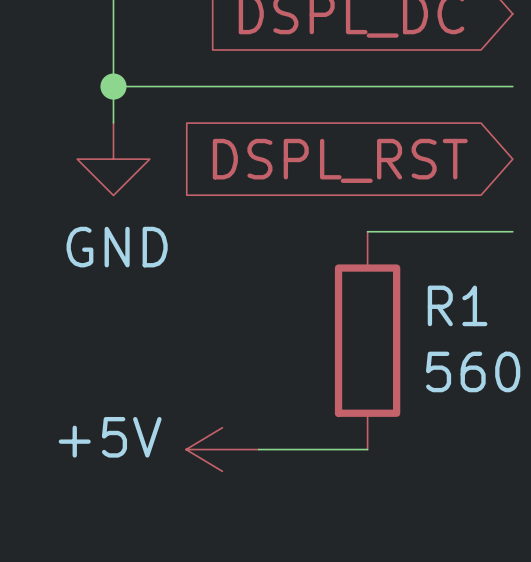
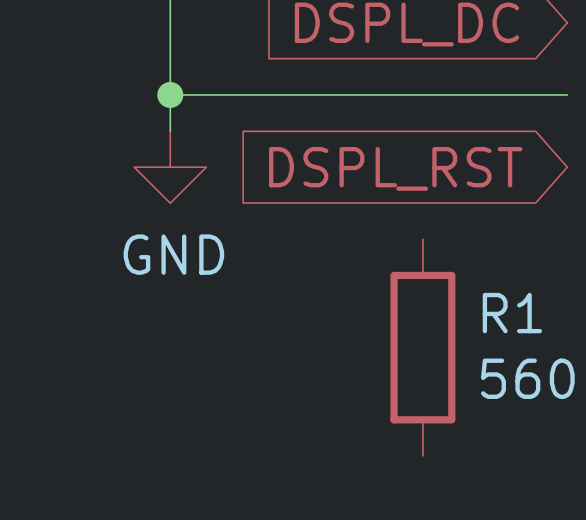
wire: (367, 231) (512, 231) -> none
power symbol: +5V (222, 449) -> none
wire: (258, 449) (367, 449) -> none

